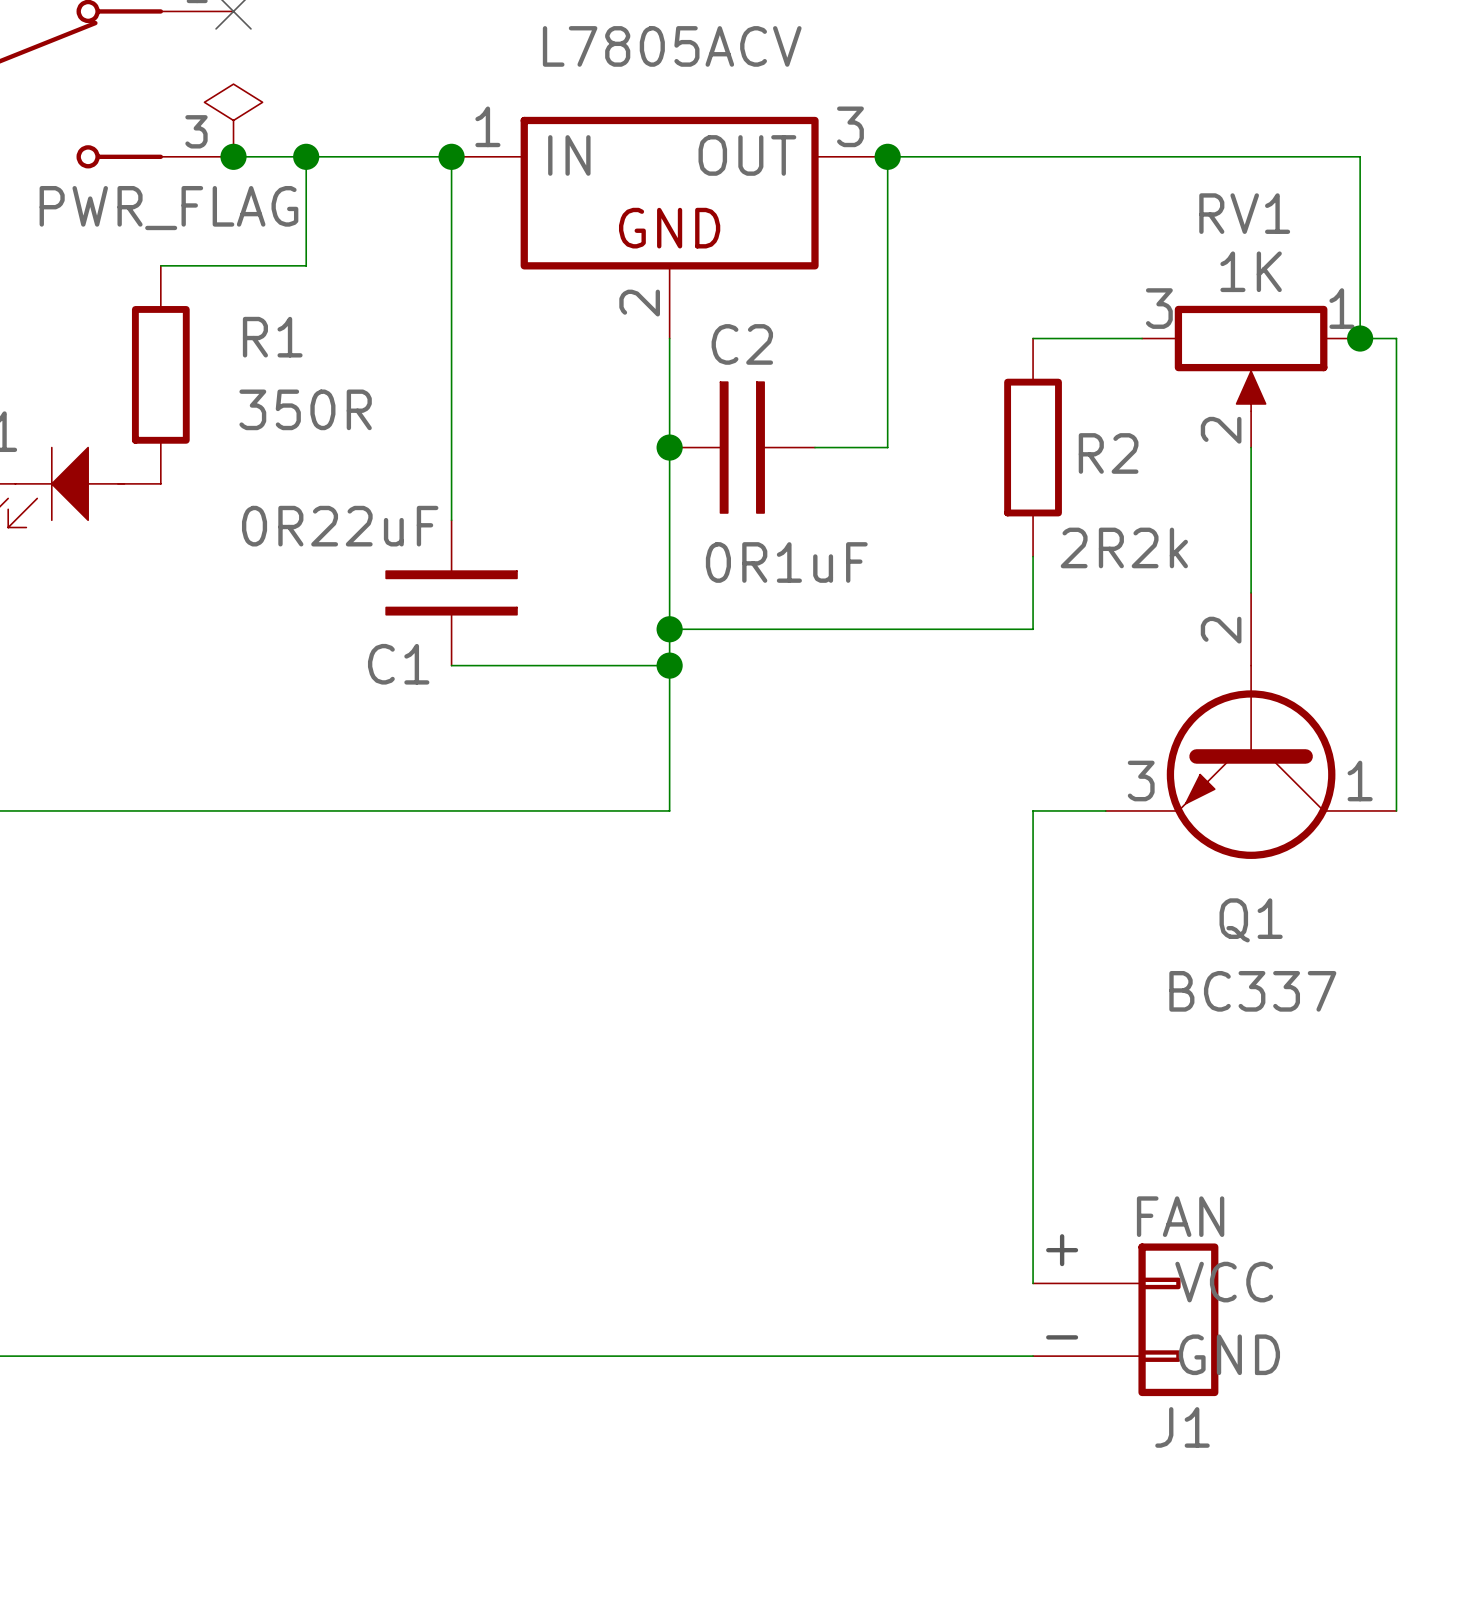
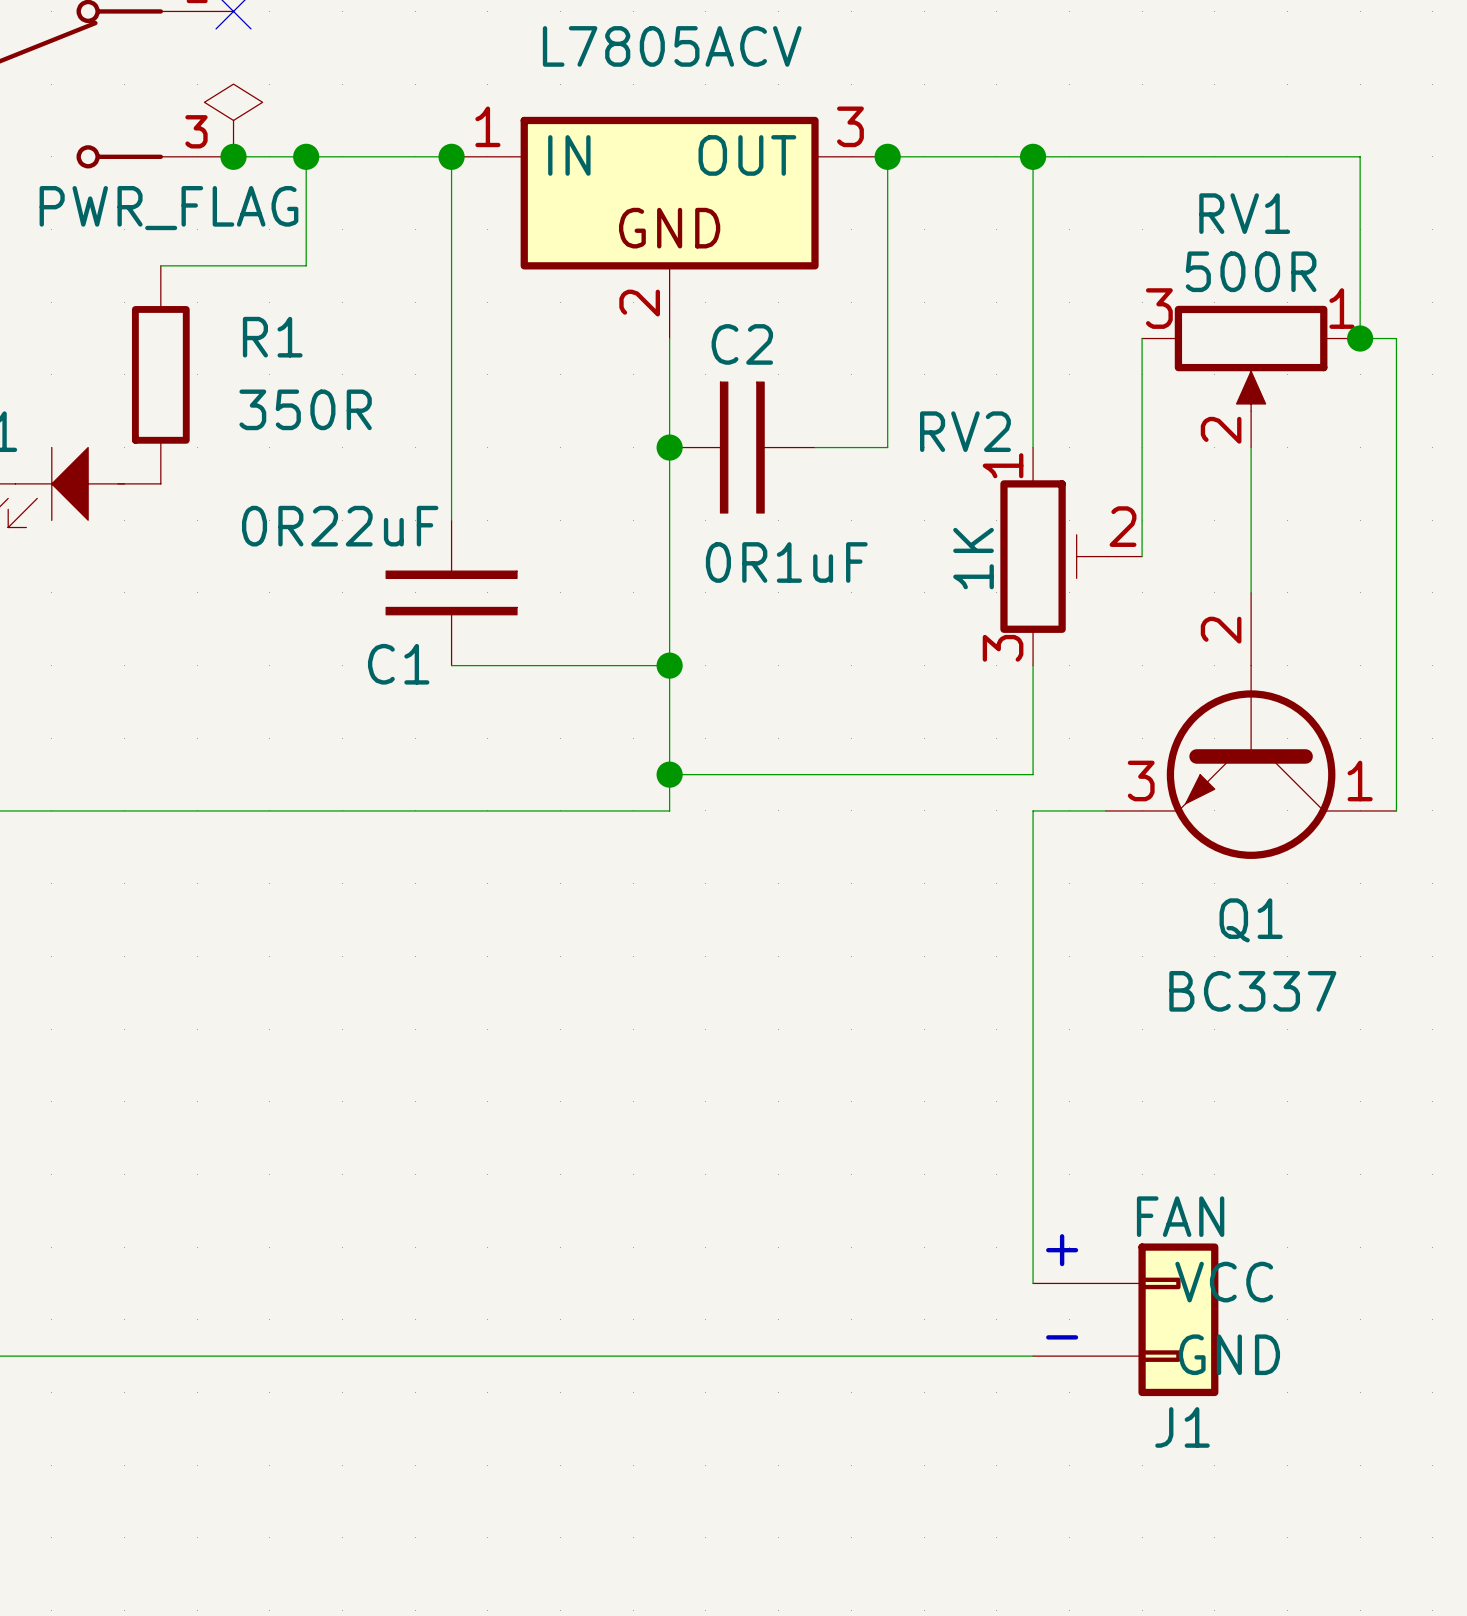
wire: none -> (1033, 156) (1033, 447)
junction: none -> (1033, 156)
RV1 value: 1K (1251, 271) -> 500R (1251, 271)
wire: (1033, 338) (1142, 338) -> (1142, 556) (1142, 338)
R2: 2R2k (1033, 447) -> none
wire: (1033, 556) (1033, 629) (669, 629) -> none
RV2: none -> 1K (1071, 556)
junction position: (669, 629) -> (669, 774)
wire: none -> (1033, 665) (1033, 774) (669, 774)

